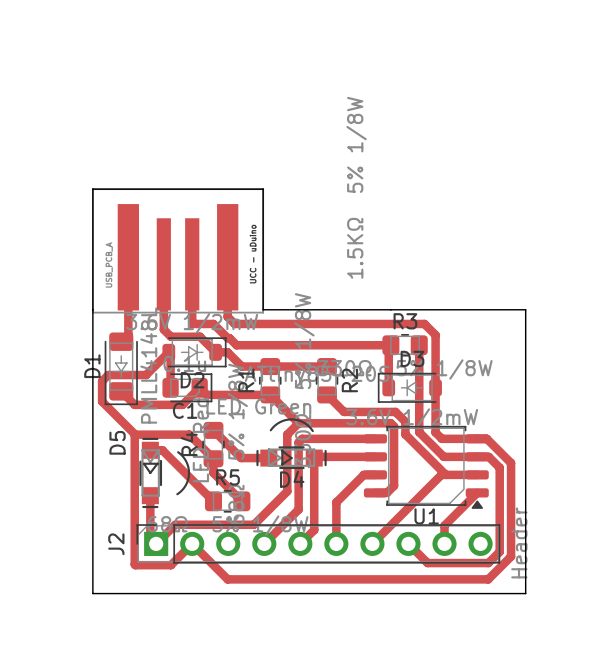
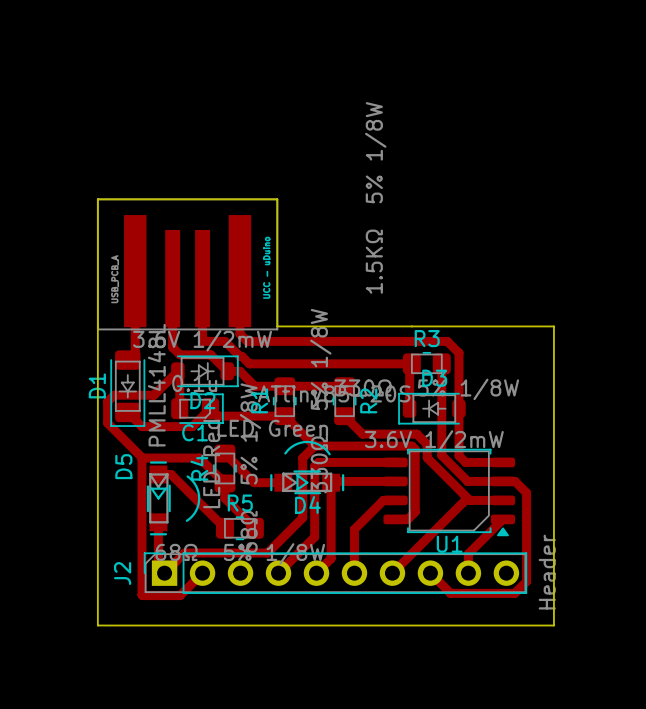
top track: (477, 438) (486, 438) (511, 463) (511, 556) (488, 579) (227, 579) (192, 543) -> none

